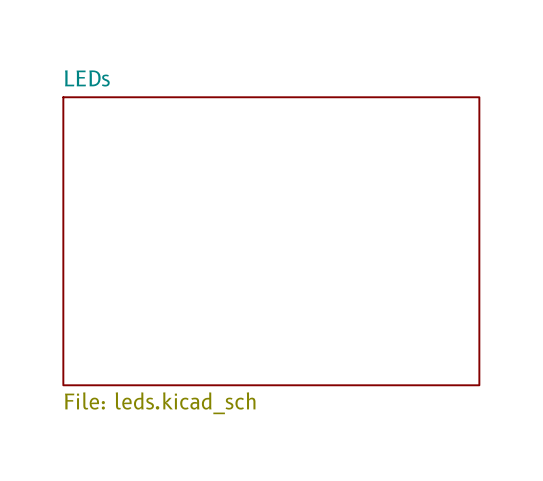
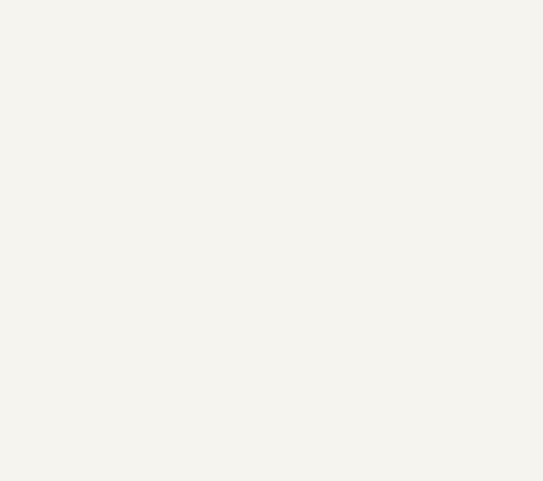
sheet LEDs: File: leds.kicad_sch (271, 241) -> none

